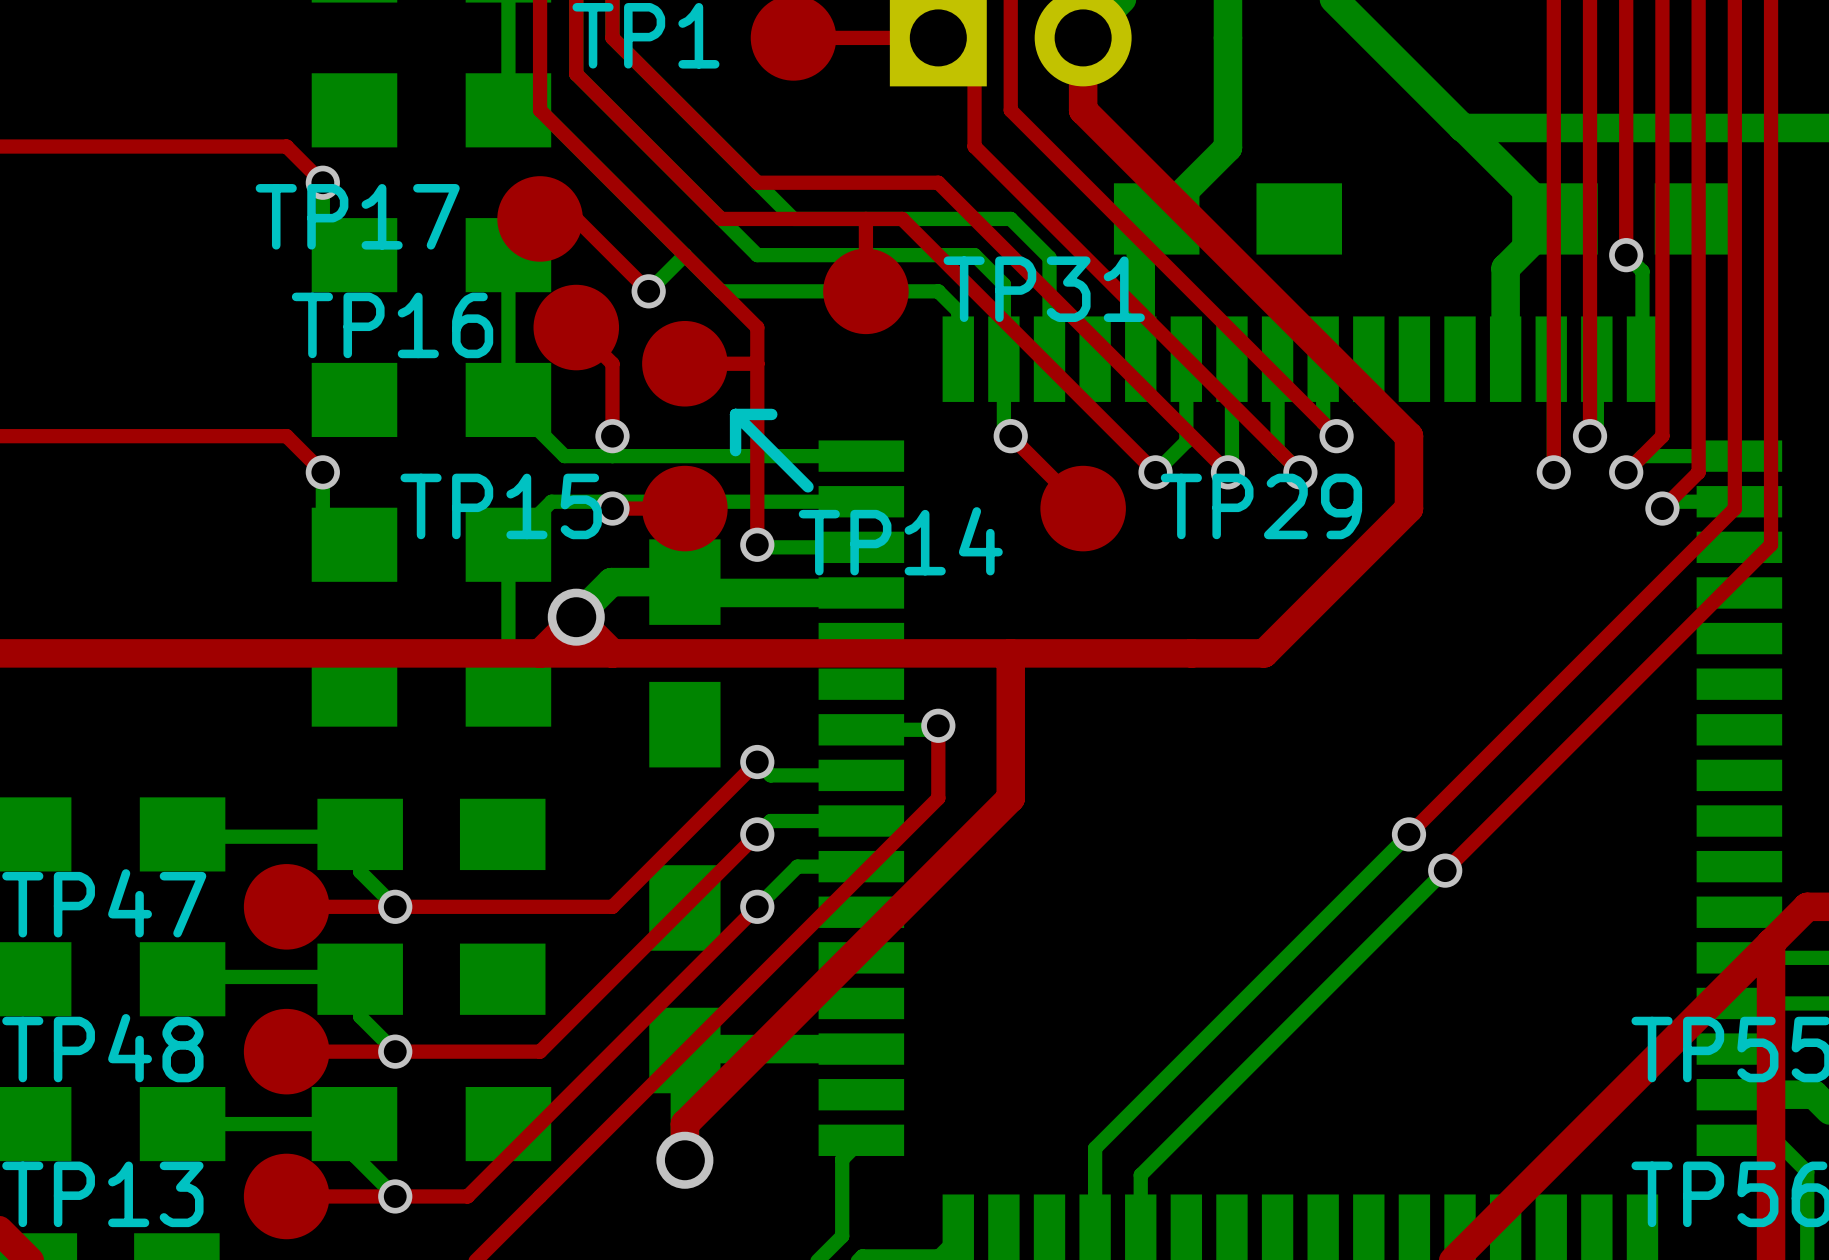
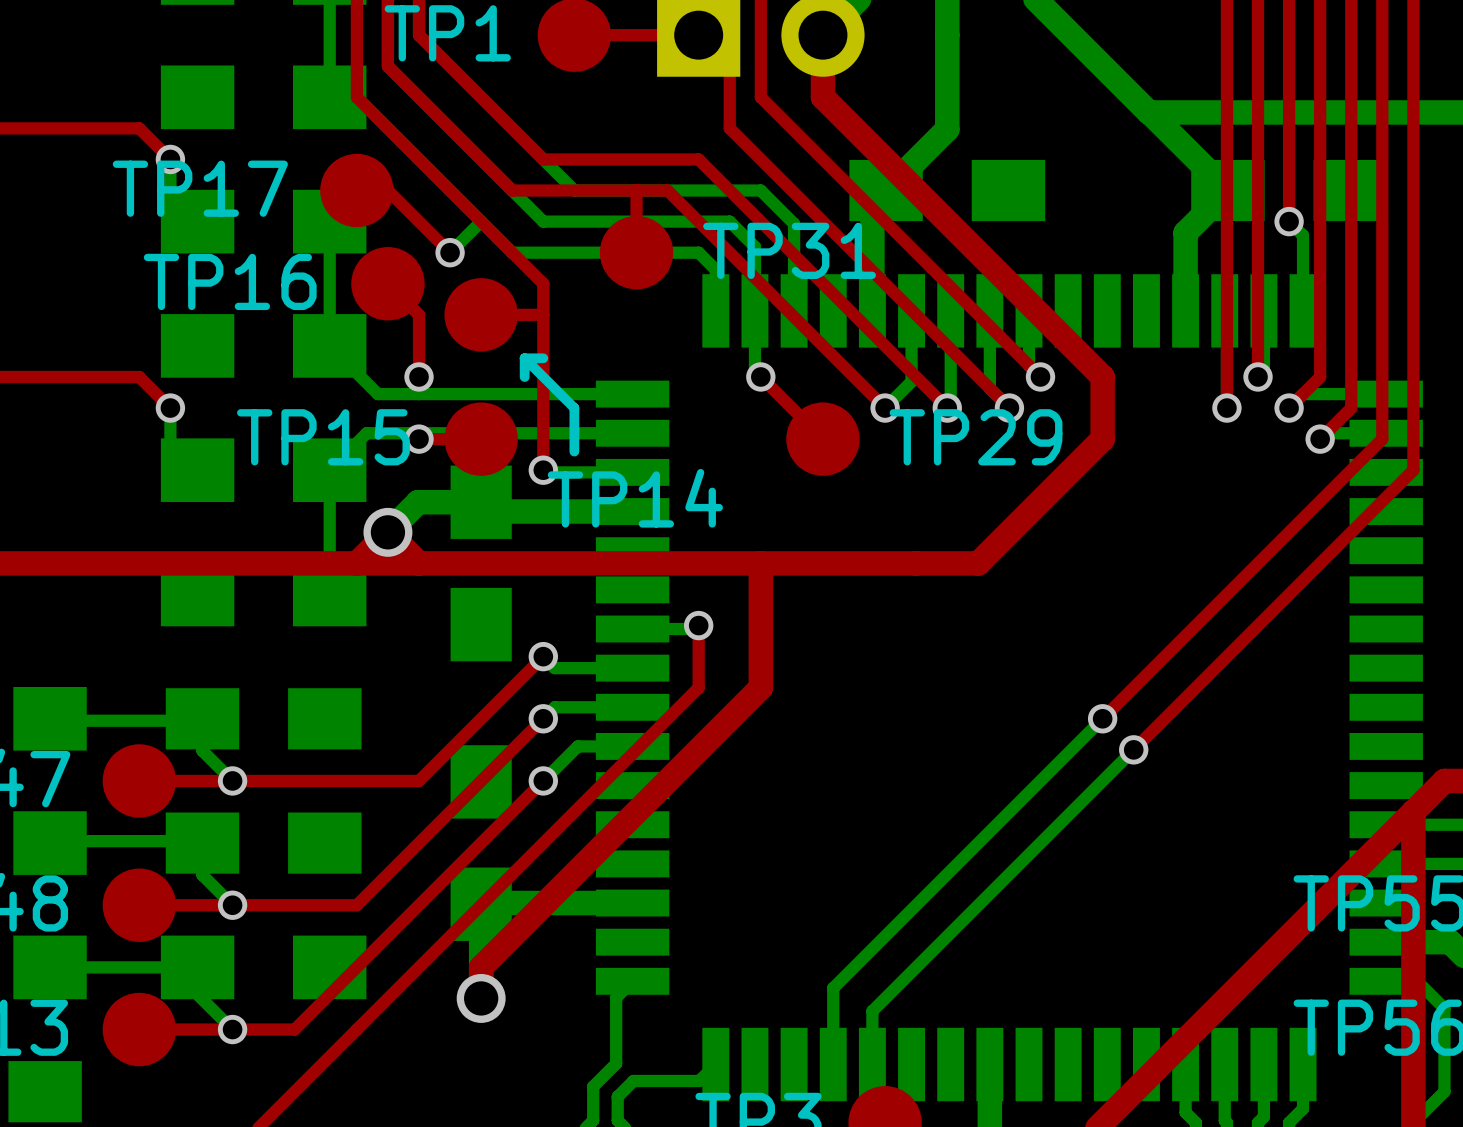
line: (757, 414) (771, 414) -> none
line: (735, 436) (735, 450) -> none
line: (793, 472) (807, 486) -> (574, 408) (574, 451)
TP14 name position: TP14 (900, 541) -> TP14 (635, 498)

